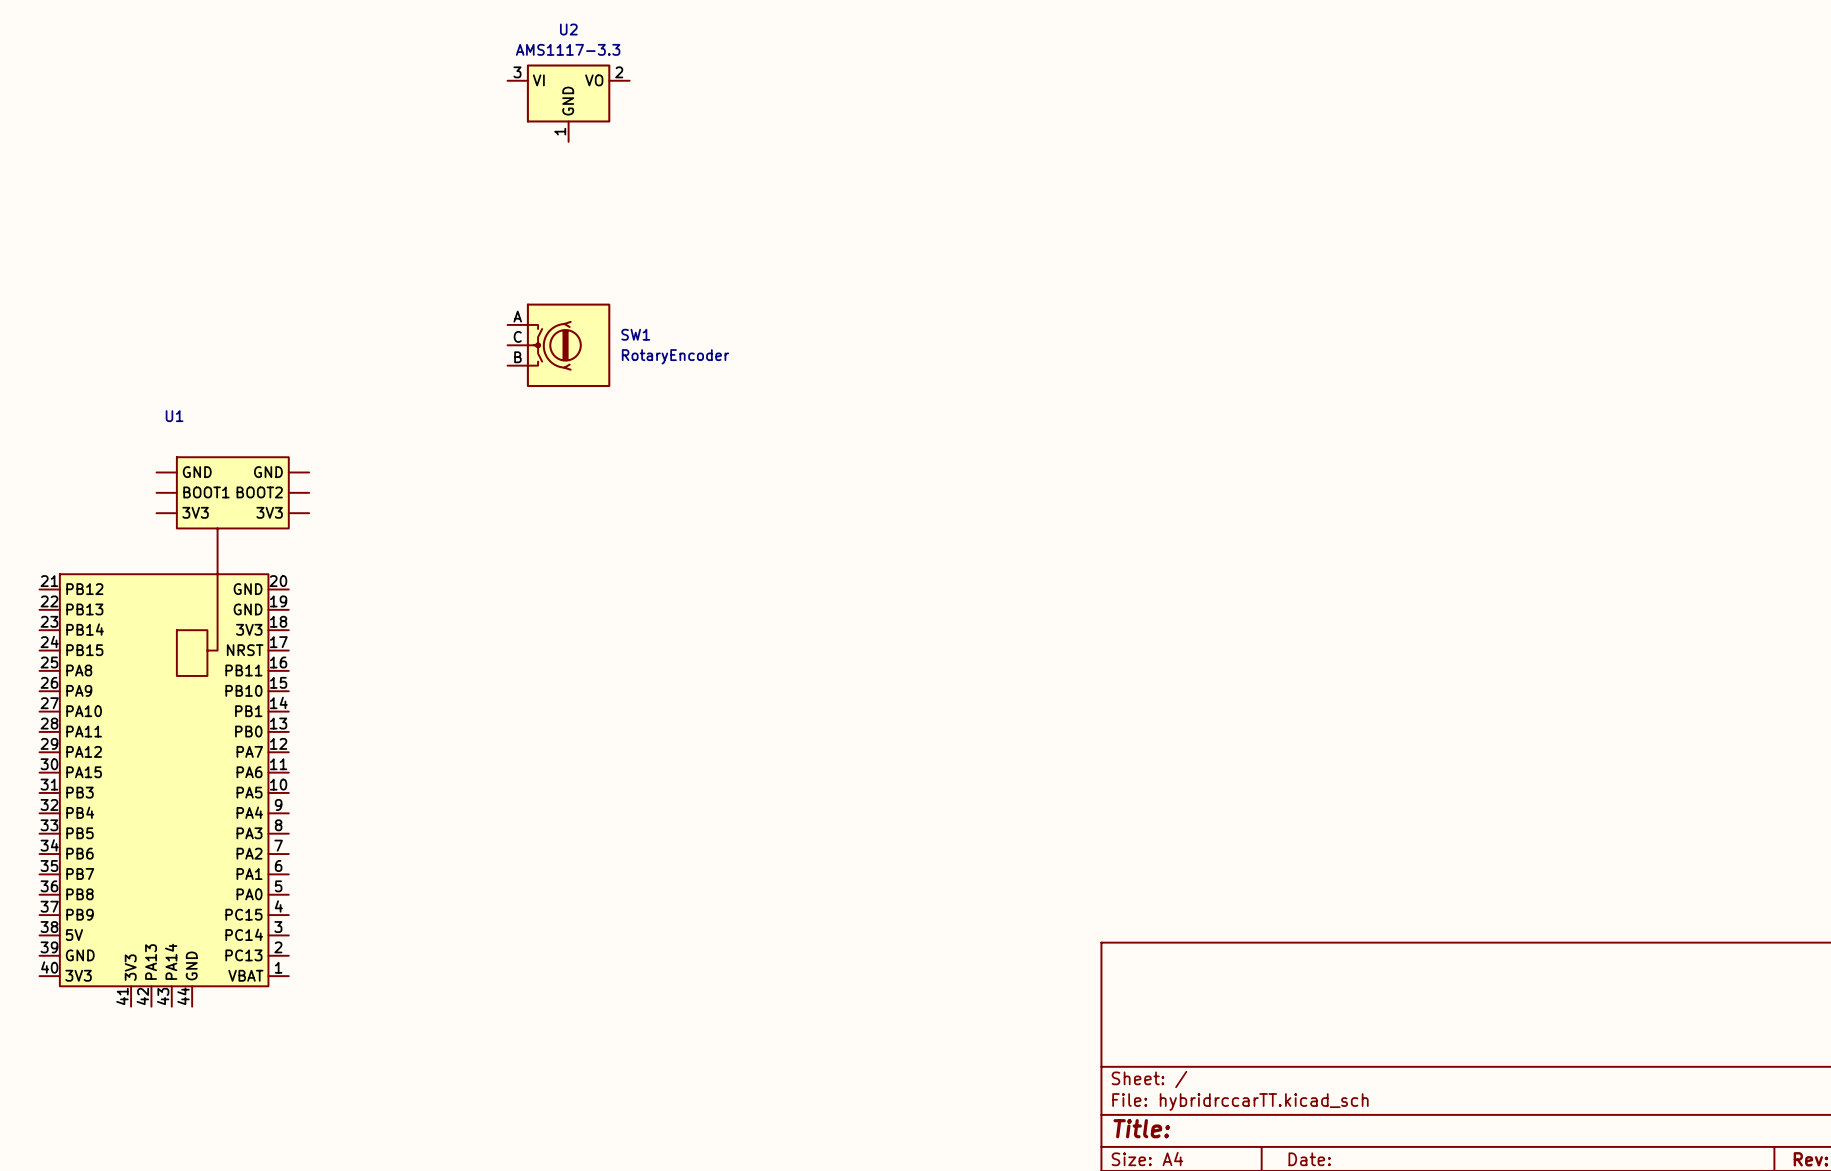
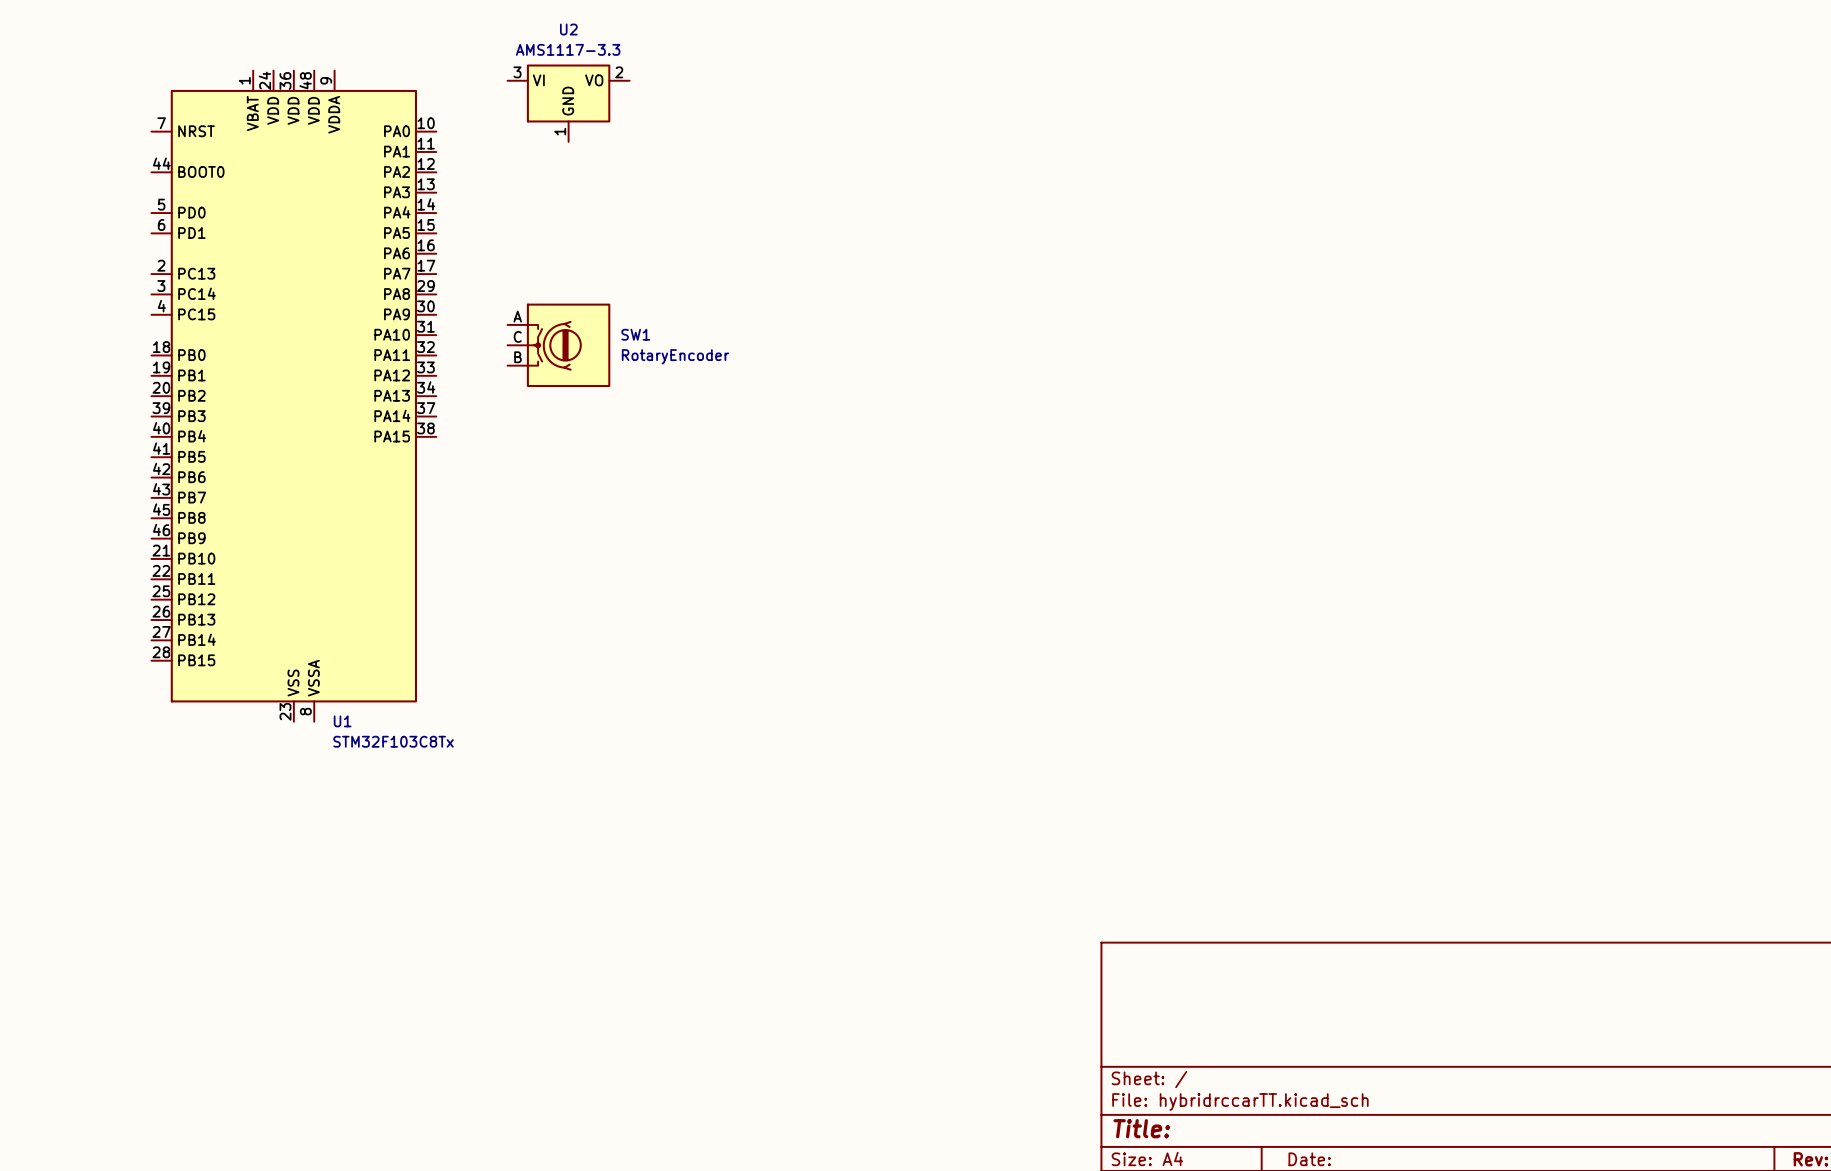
U1 name position: U1 (174, 416) -> U1 (342, 721)
U1 symbol: [39, 457, 310, 1007] -> [151, 70, 437, 722]
U1 value: none -> STM32F103C8Tx (393, 741)

